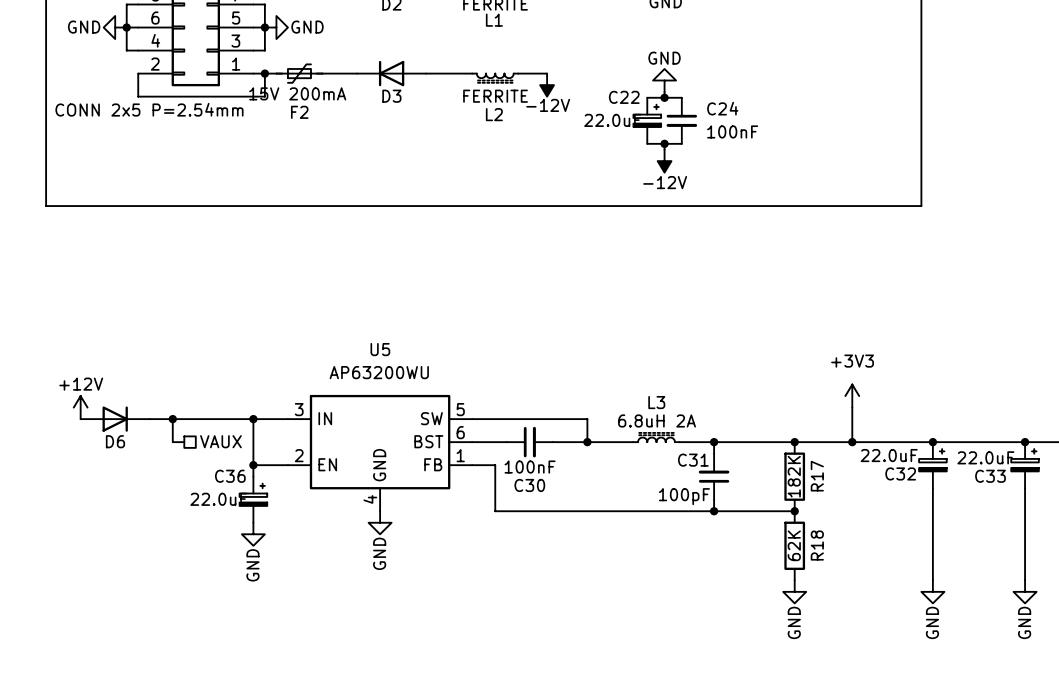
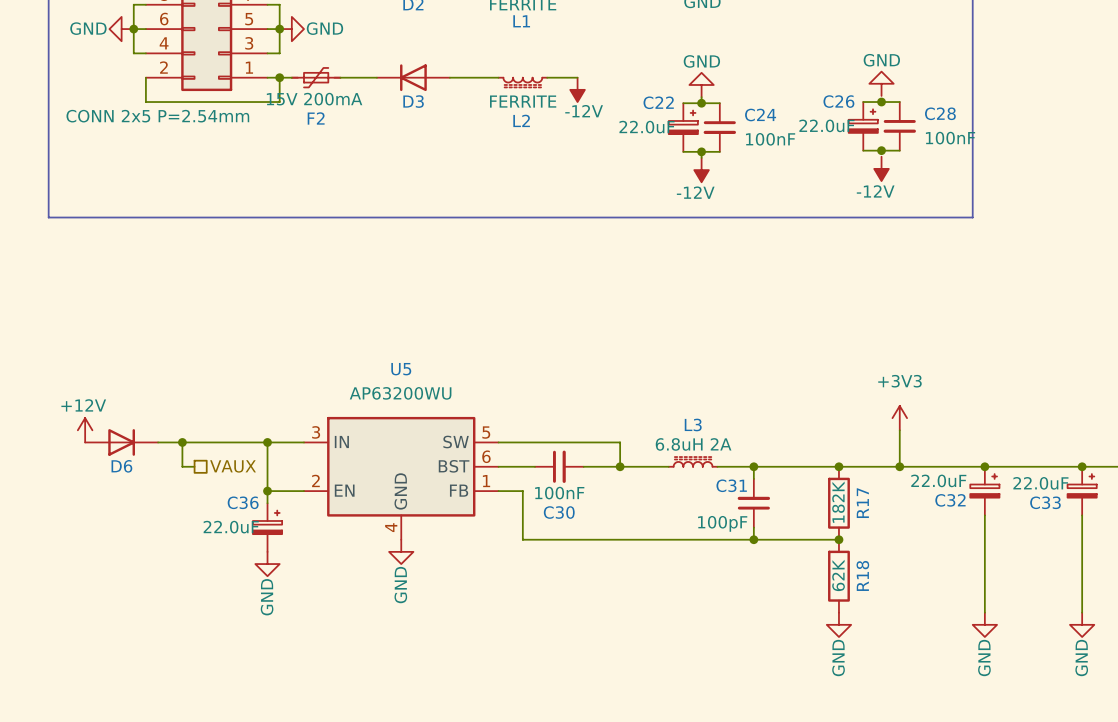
power symbol: none -> GND (881, 83)
wire: none -> (863, 102) (899, 102)
junction: none -> (881, 102)
C26: none -> 22.0uF (863, 126)
C28: none -> 100nF (899, 126)
wire: none -> (863, 150) (899, 150)
junction: none -> (881, 150)
power symbol: none -> -12V (881, 168)

